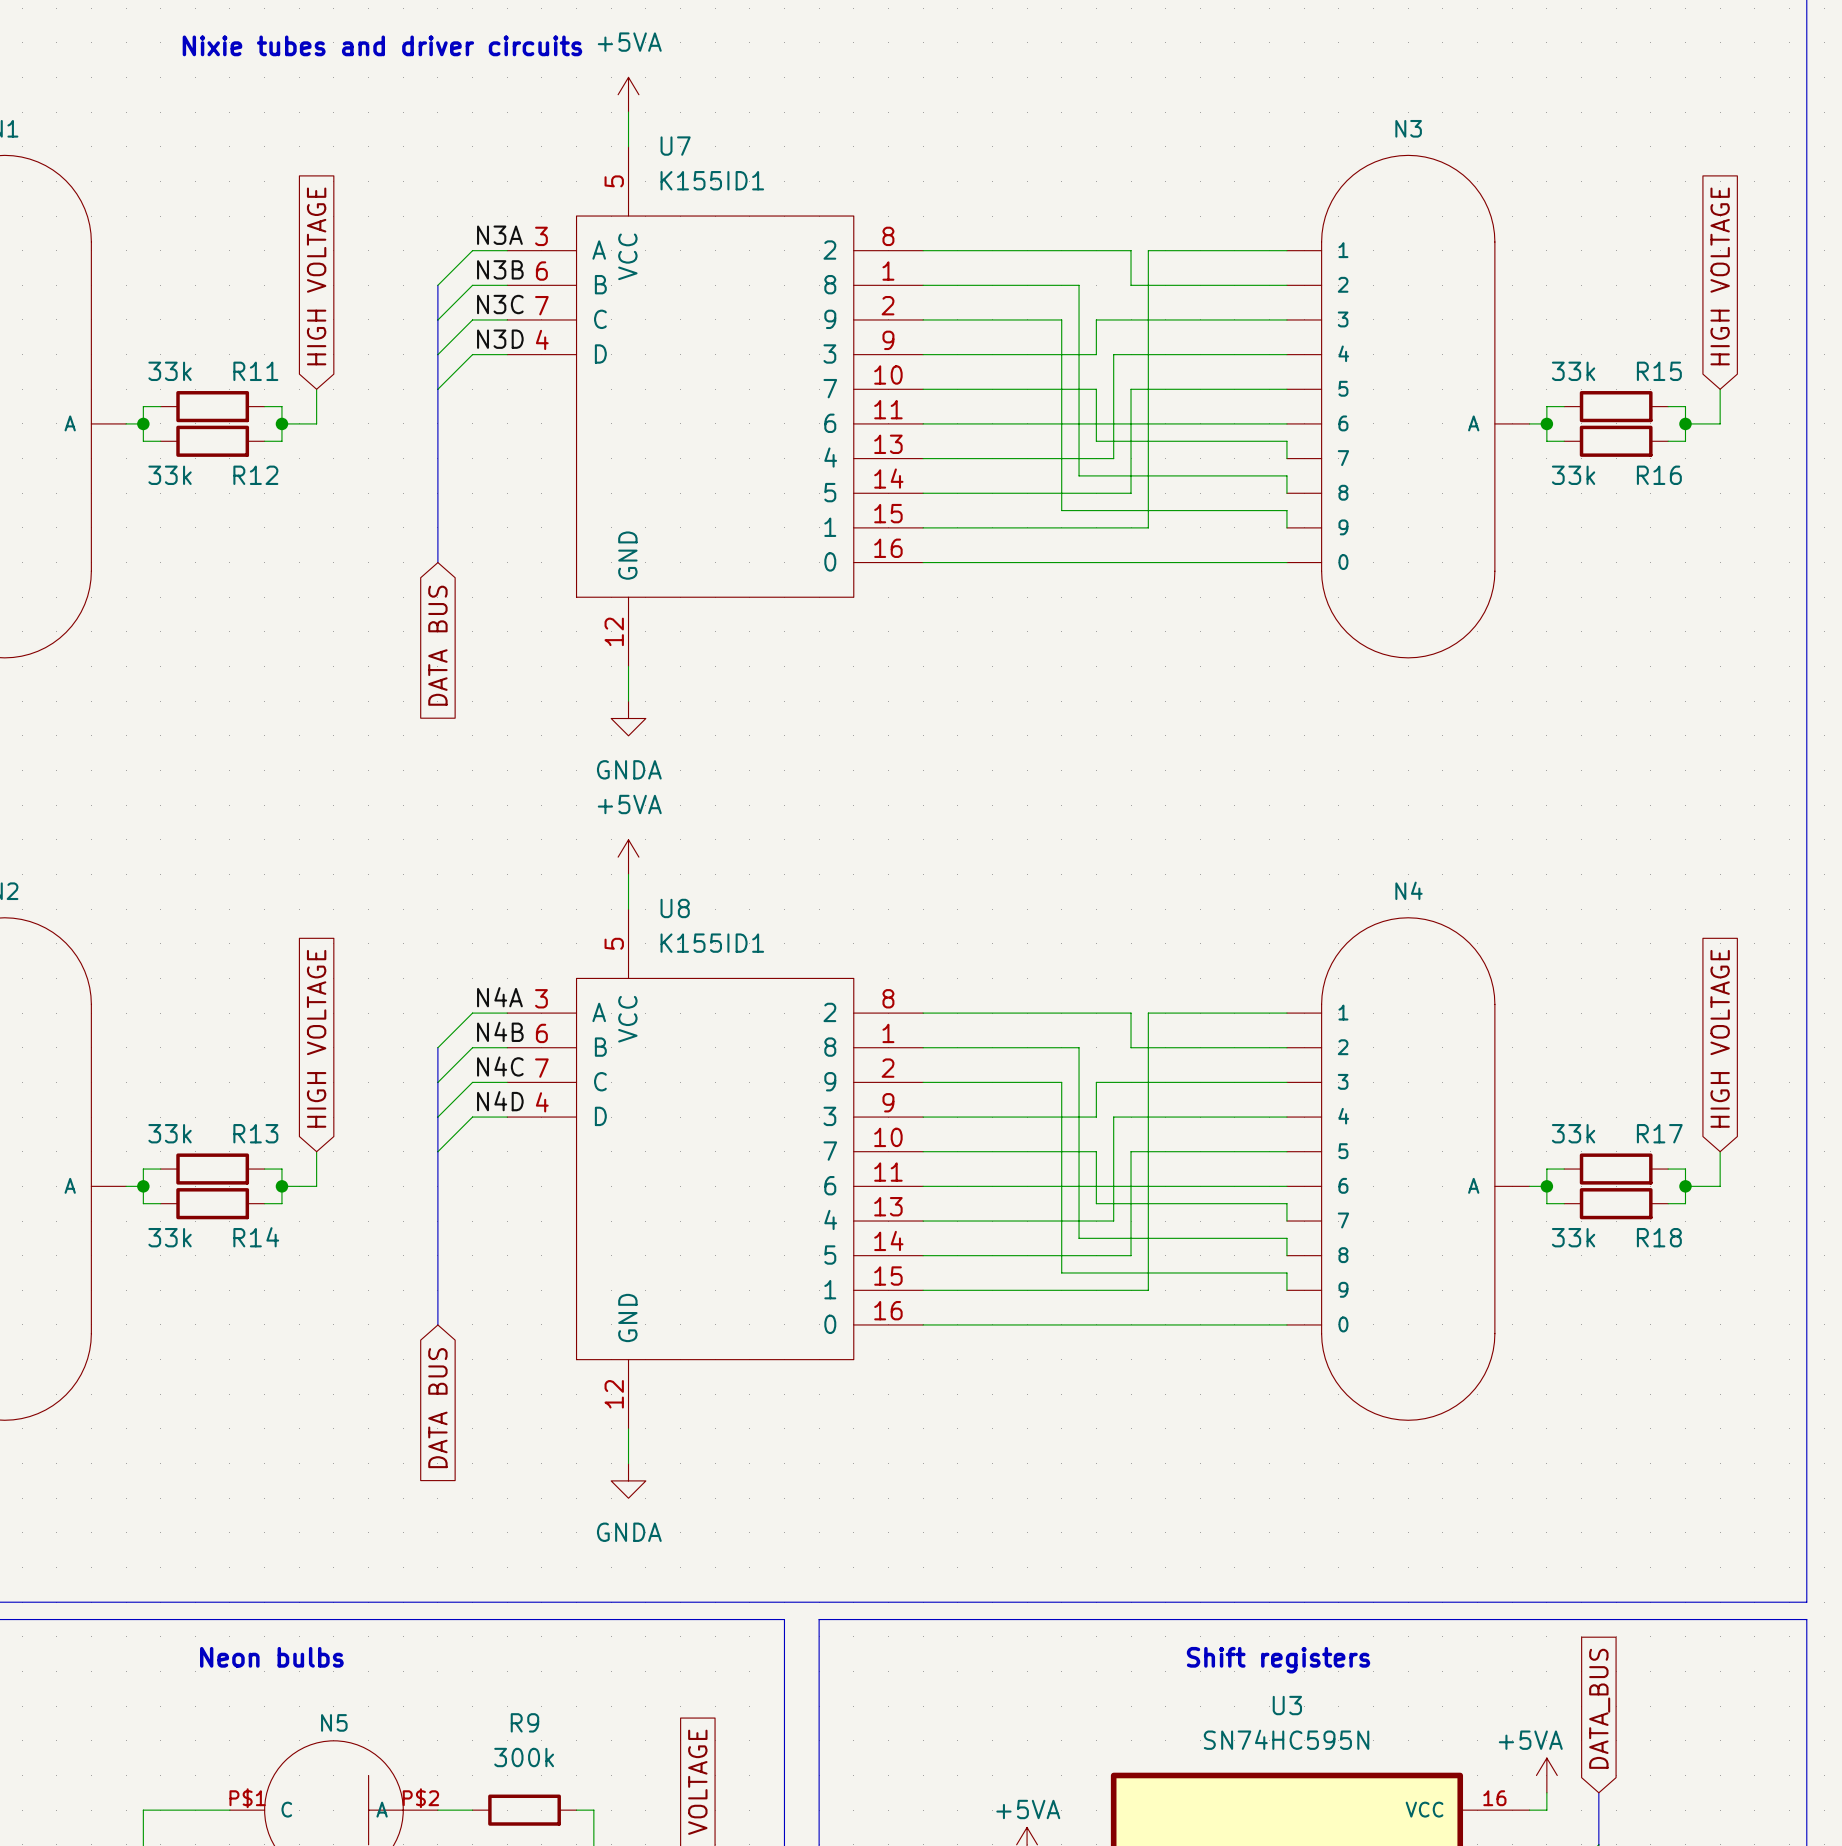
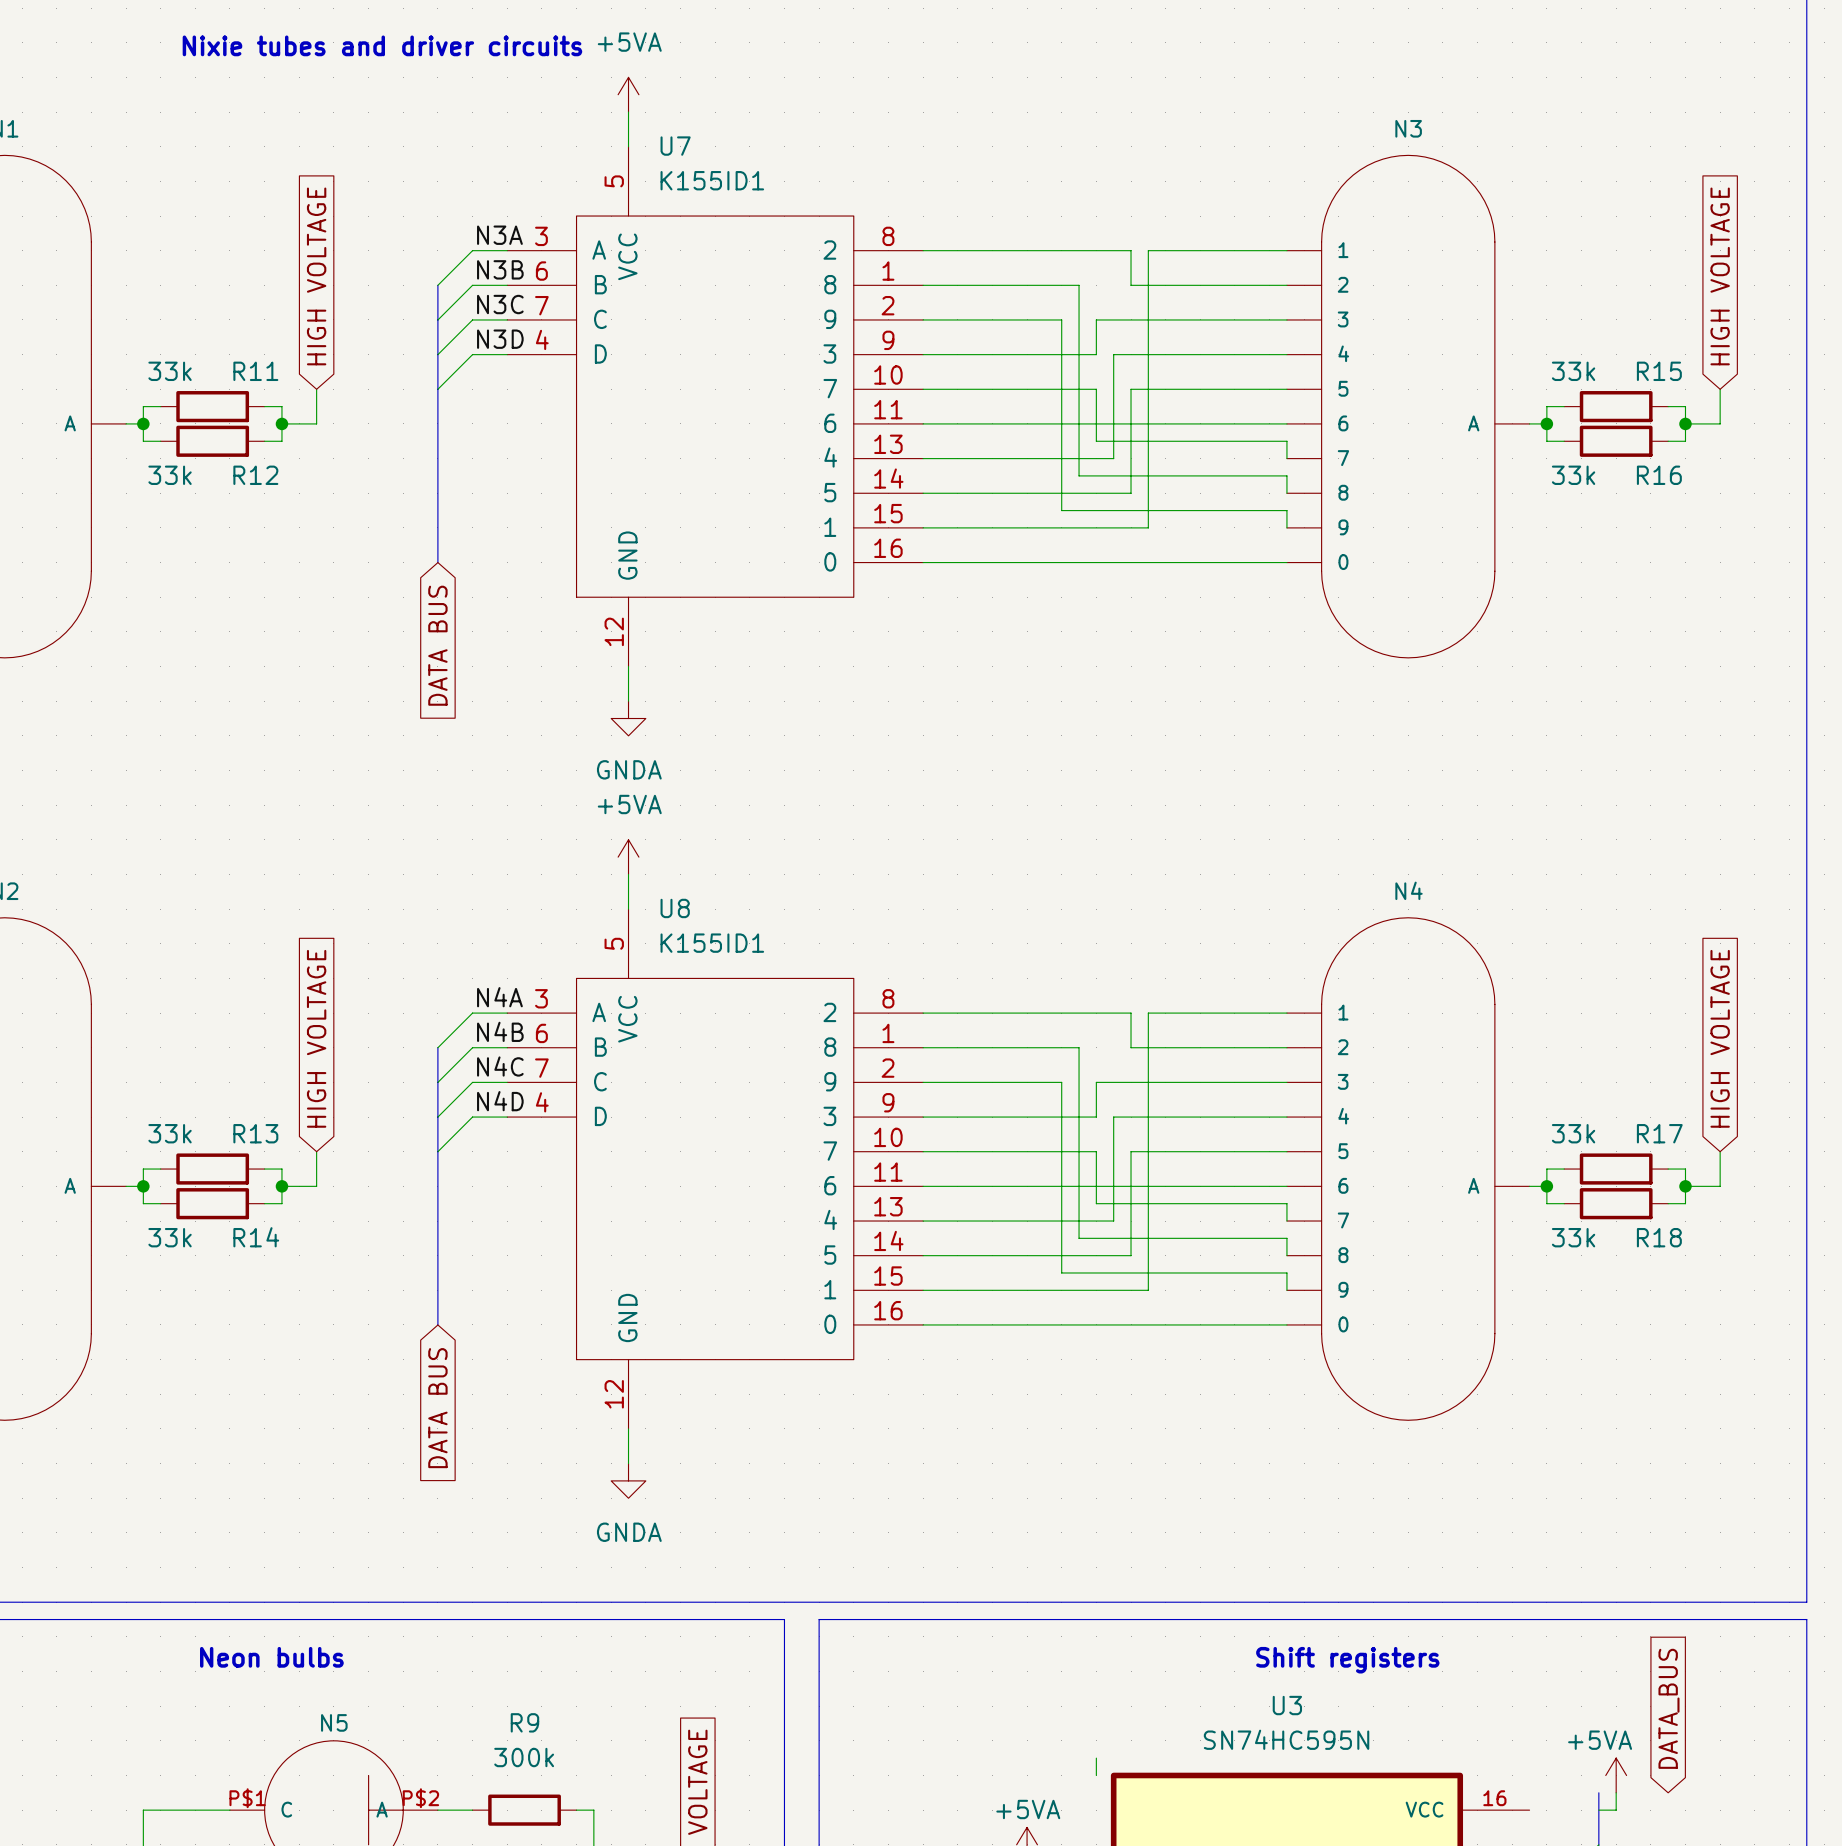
text position: Shift registers (1278, 1660) -> Shift registers (1347, 1660)
global label position: DATA_BUS (1599, 1708) -> DATA_BUS (1668, 1708)
wire: none -> (1096, 1758) (1096, 1775)
power symbol position: +5VA (1546, 1775) -> +5VA (1616, 1775)
wire: (1546, 1792) (1546, 1810) (1529, 1810) -> (1616, 1792) (1616, 1810) (1598, 1810)

